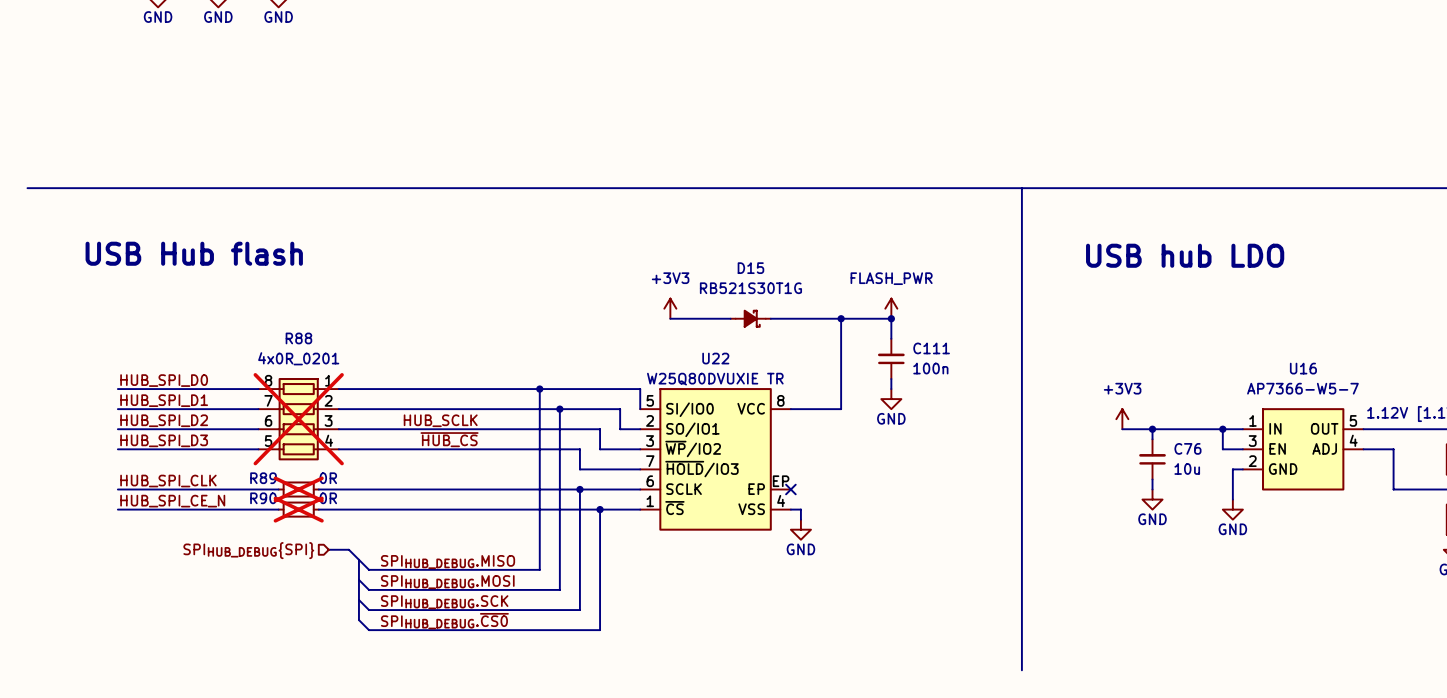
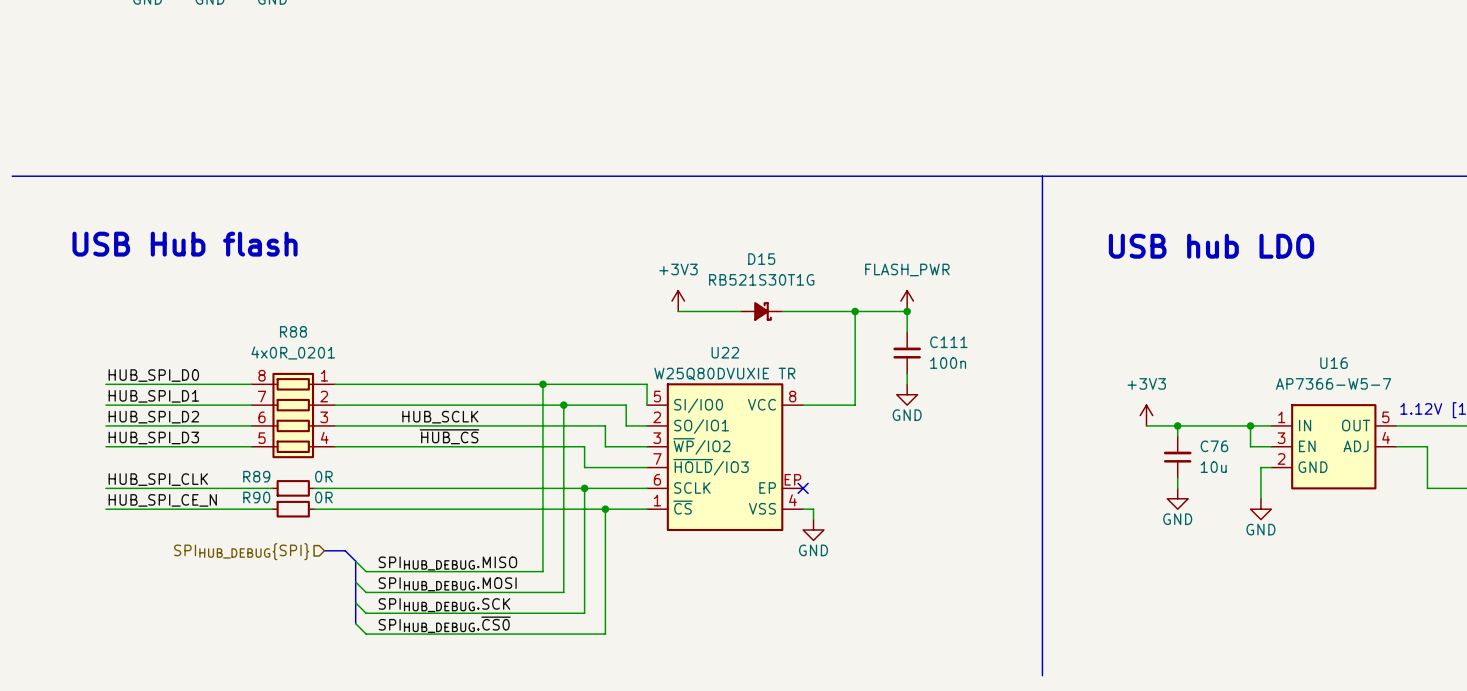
R88 do-not-place cross: (298, 419) -> none
R89 do-not-place cross: (298, 489) -> none
R90 do-not-place cross: (298, 509) -> none

